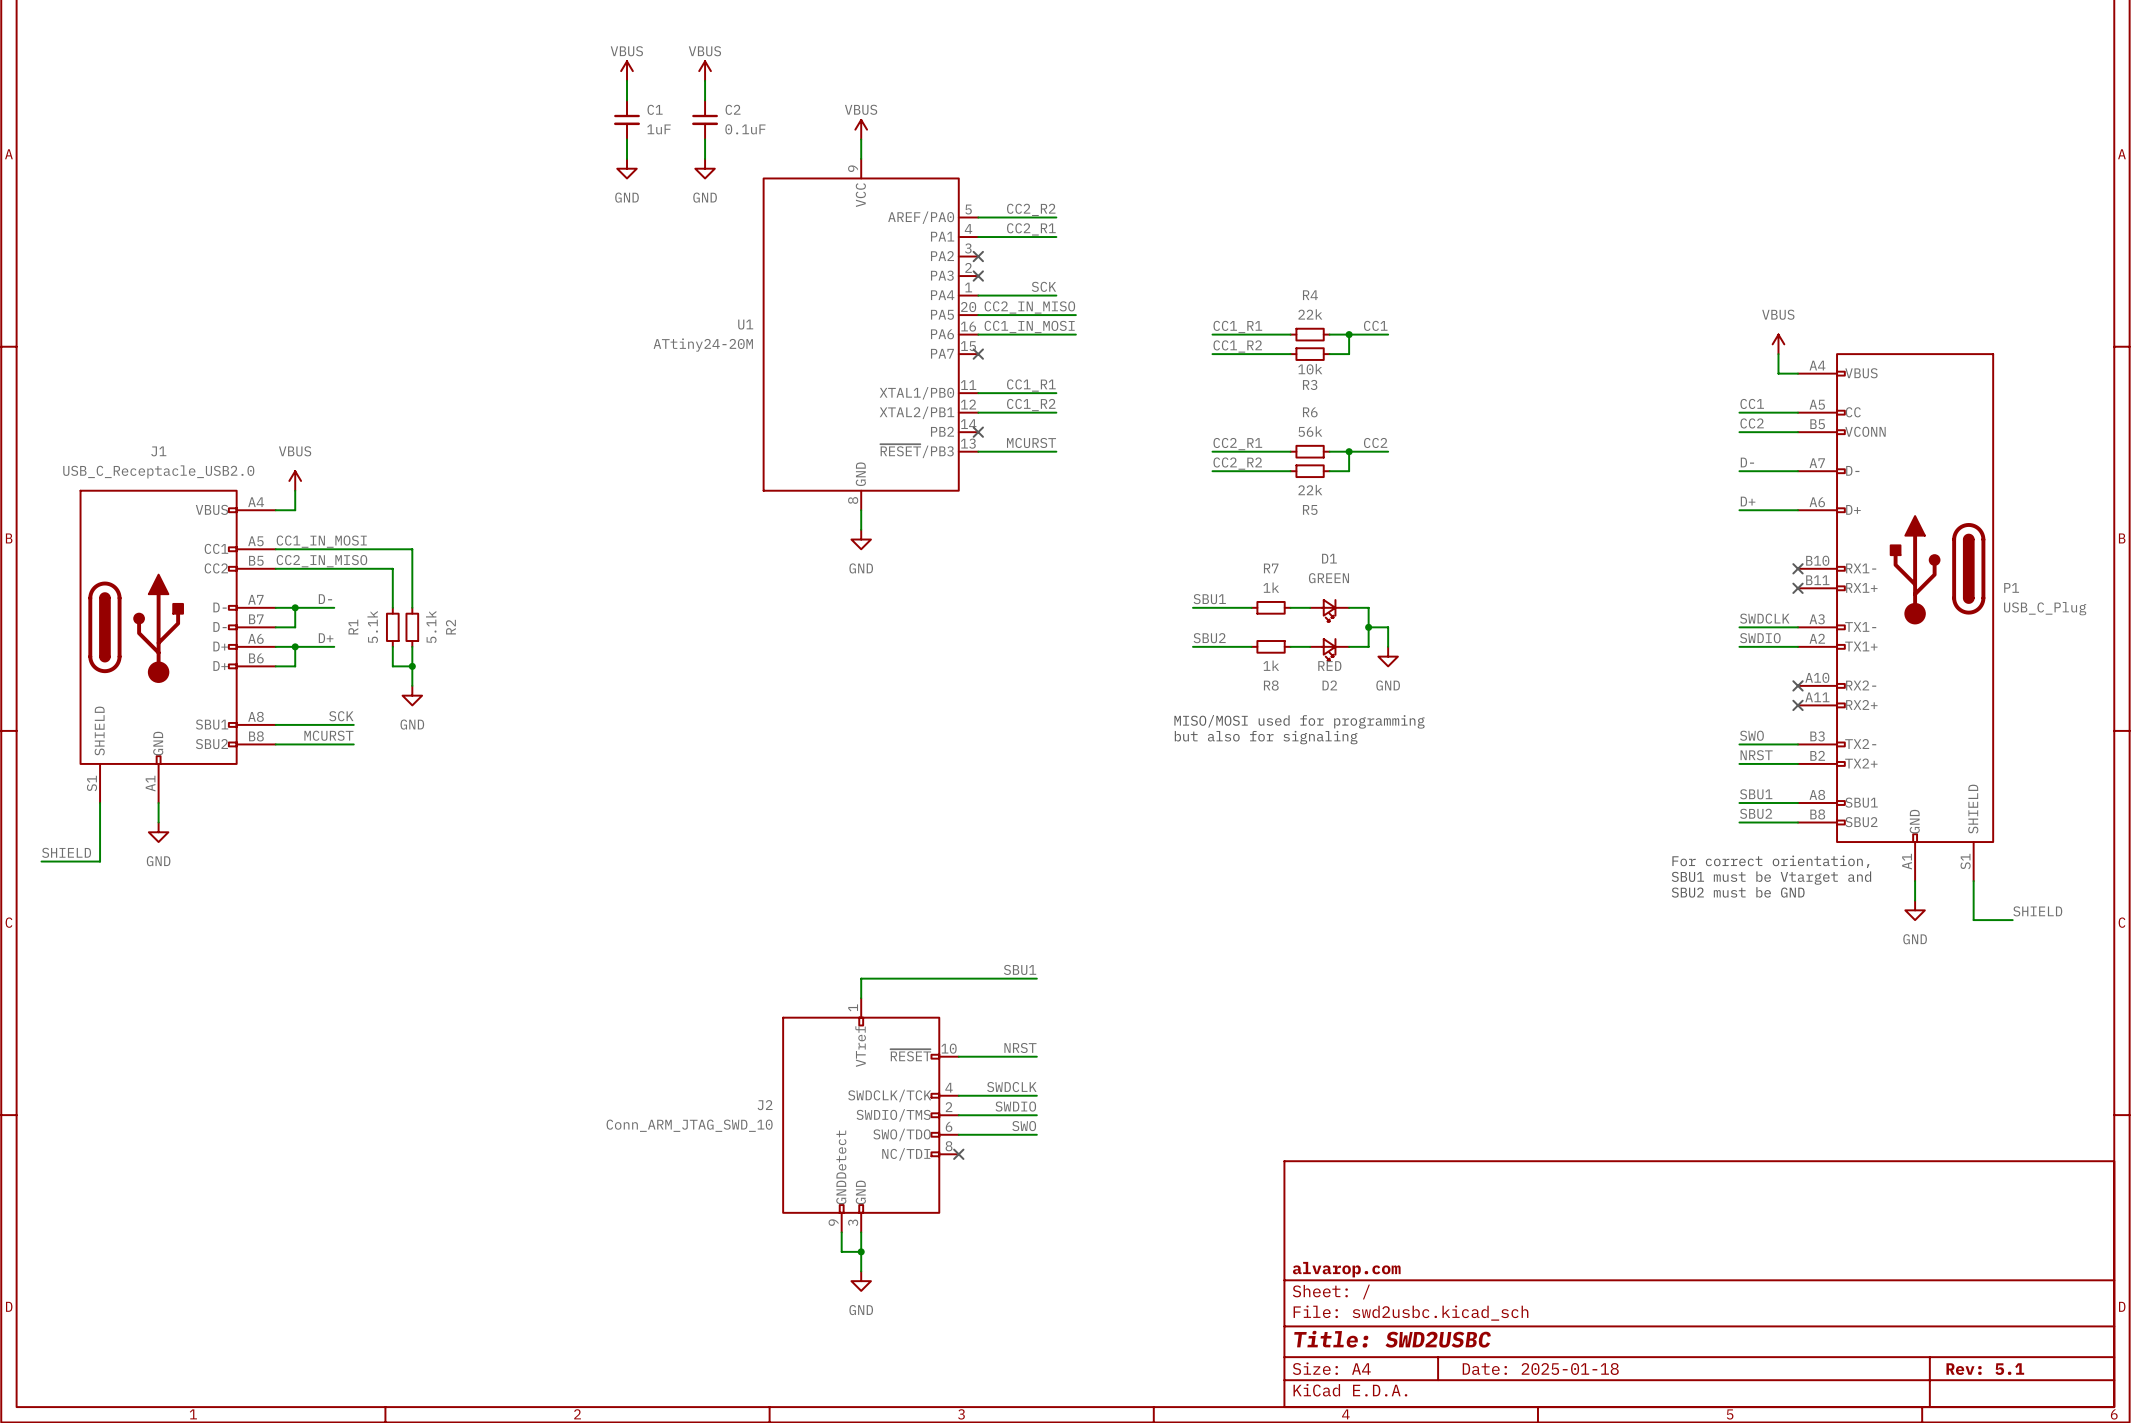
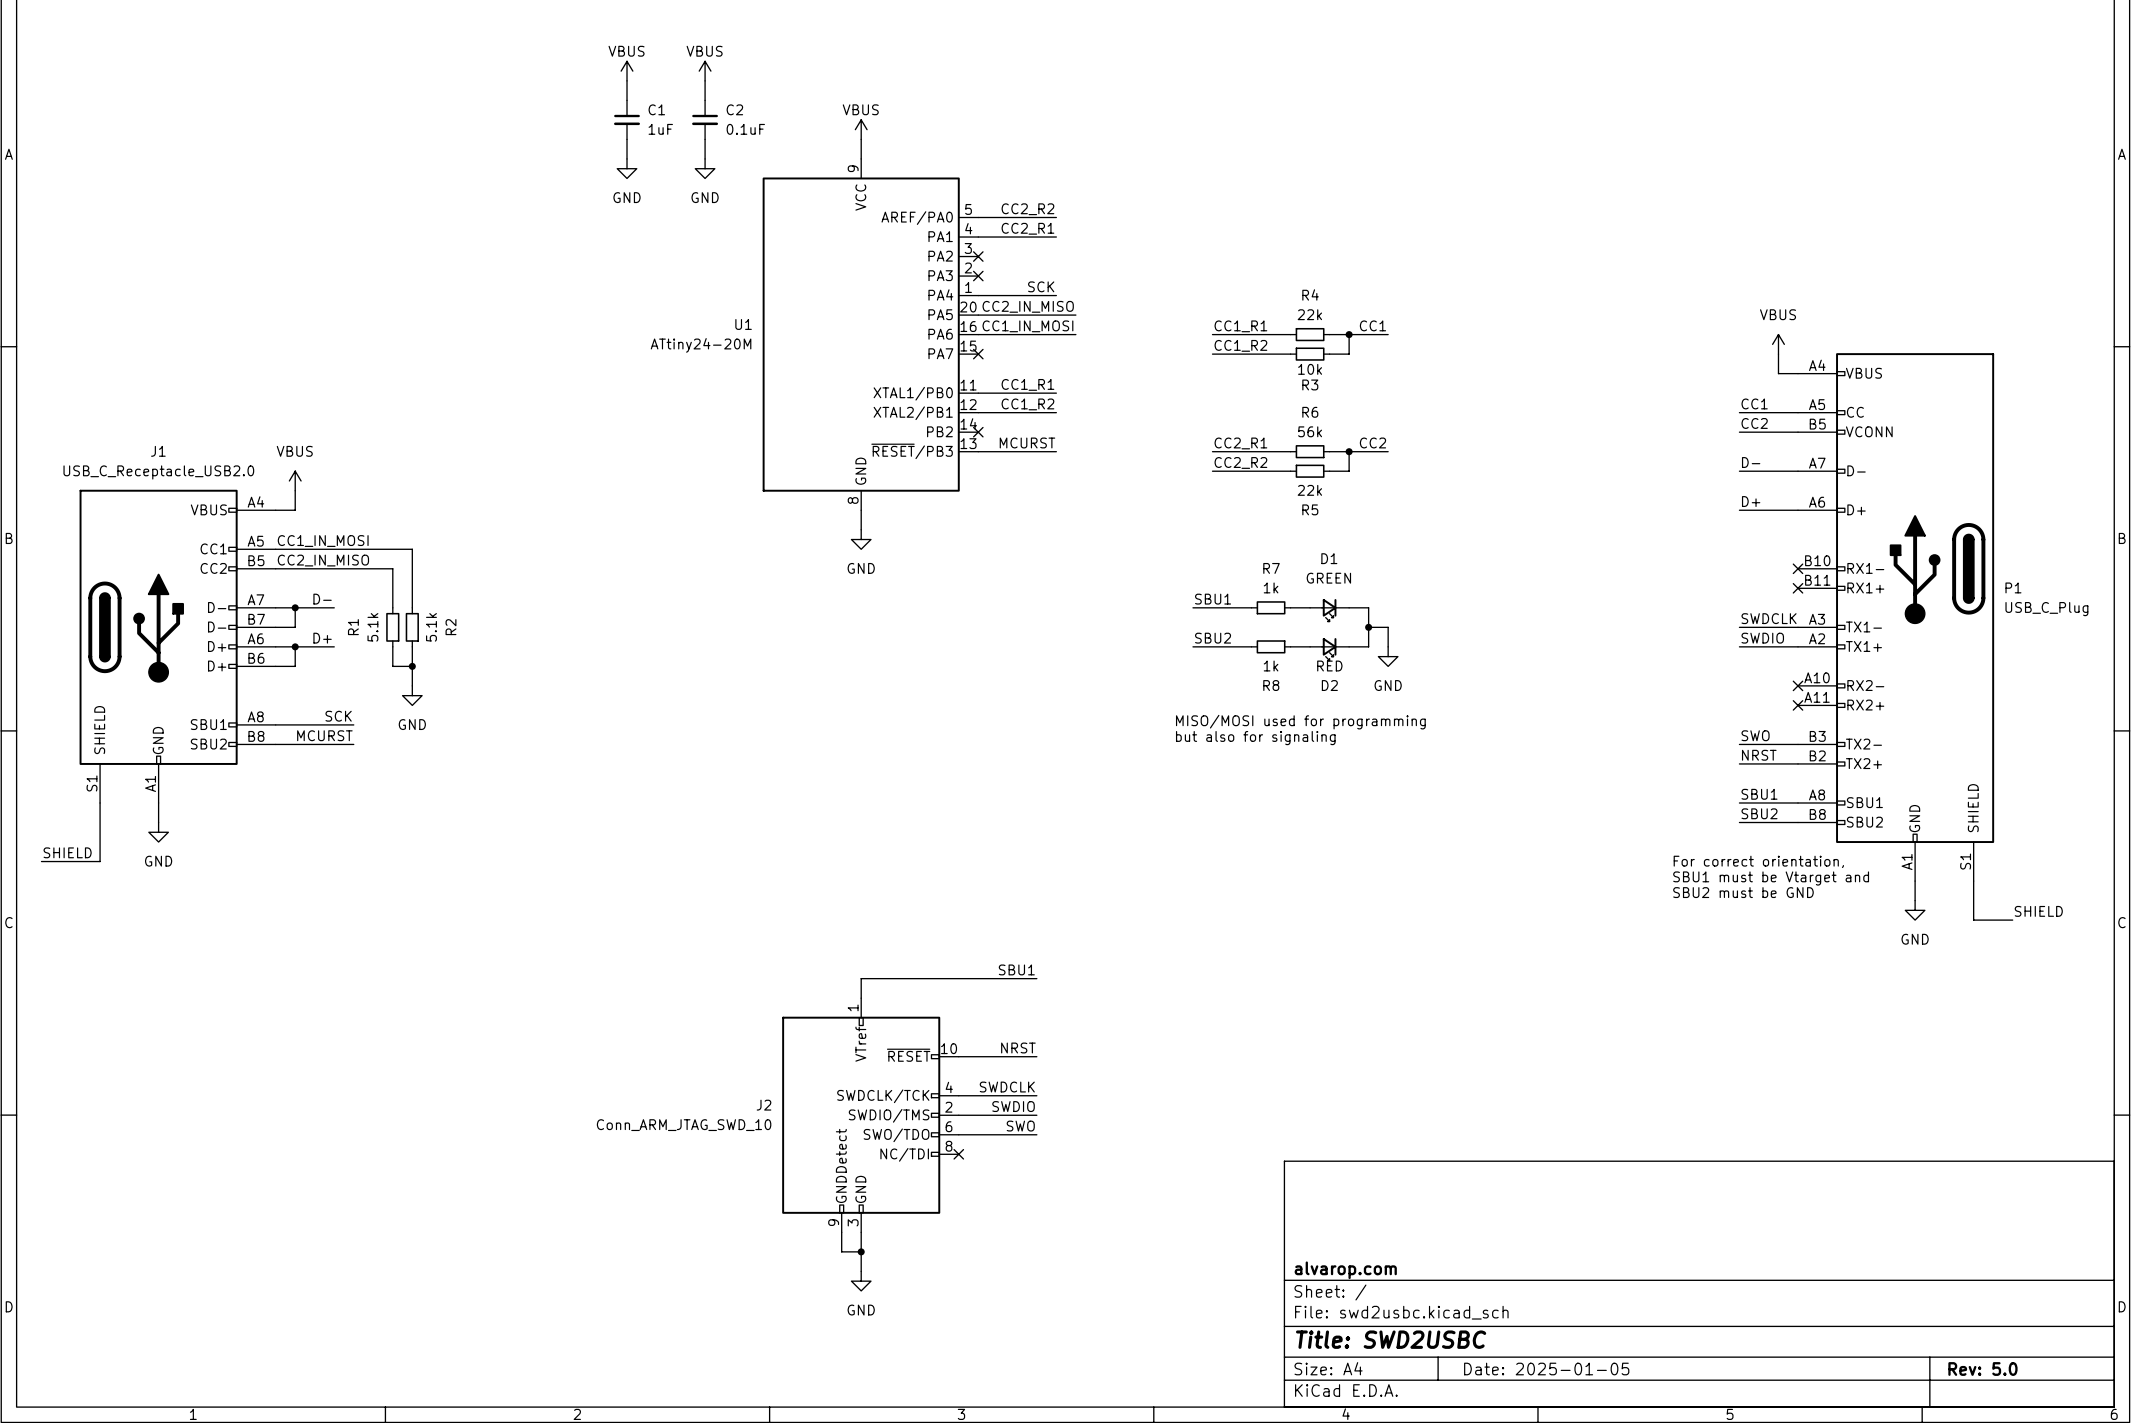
title block: Date: 2025-01-18 (1540, 1369) -> Date: 2025-01-05 (1546, 1369)
title block: Rev: 5.1 (1985, 1369) -> Rev: 5.0 (1982, 1369)

